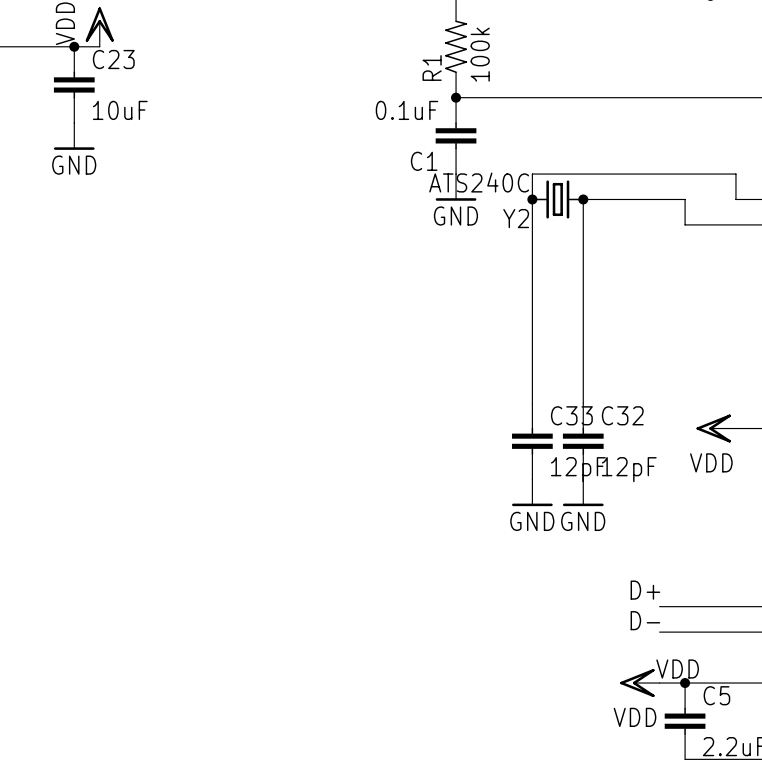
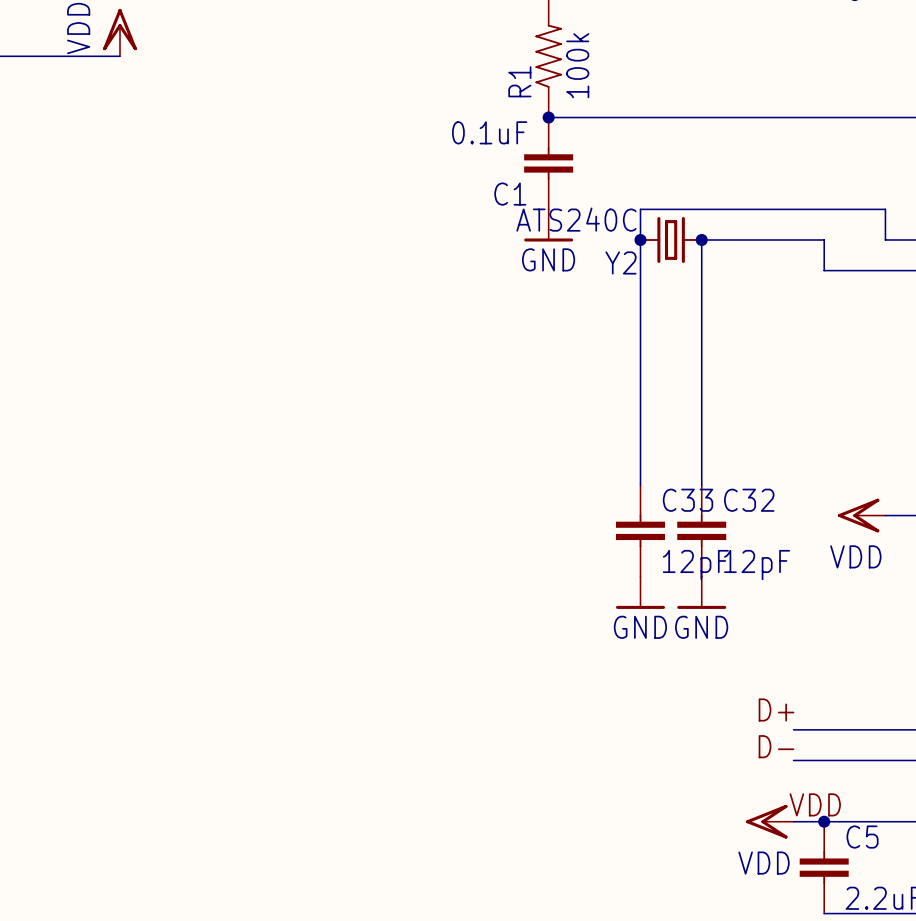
junction: (74, 46) -> none
C23: 10uF (74, 84) -> none
power symbol: GND (74, 136) -> none

